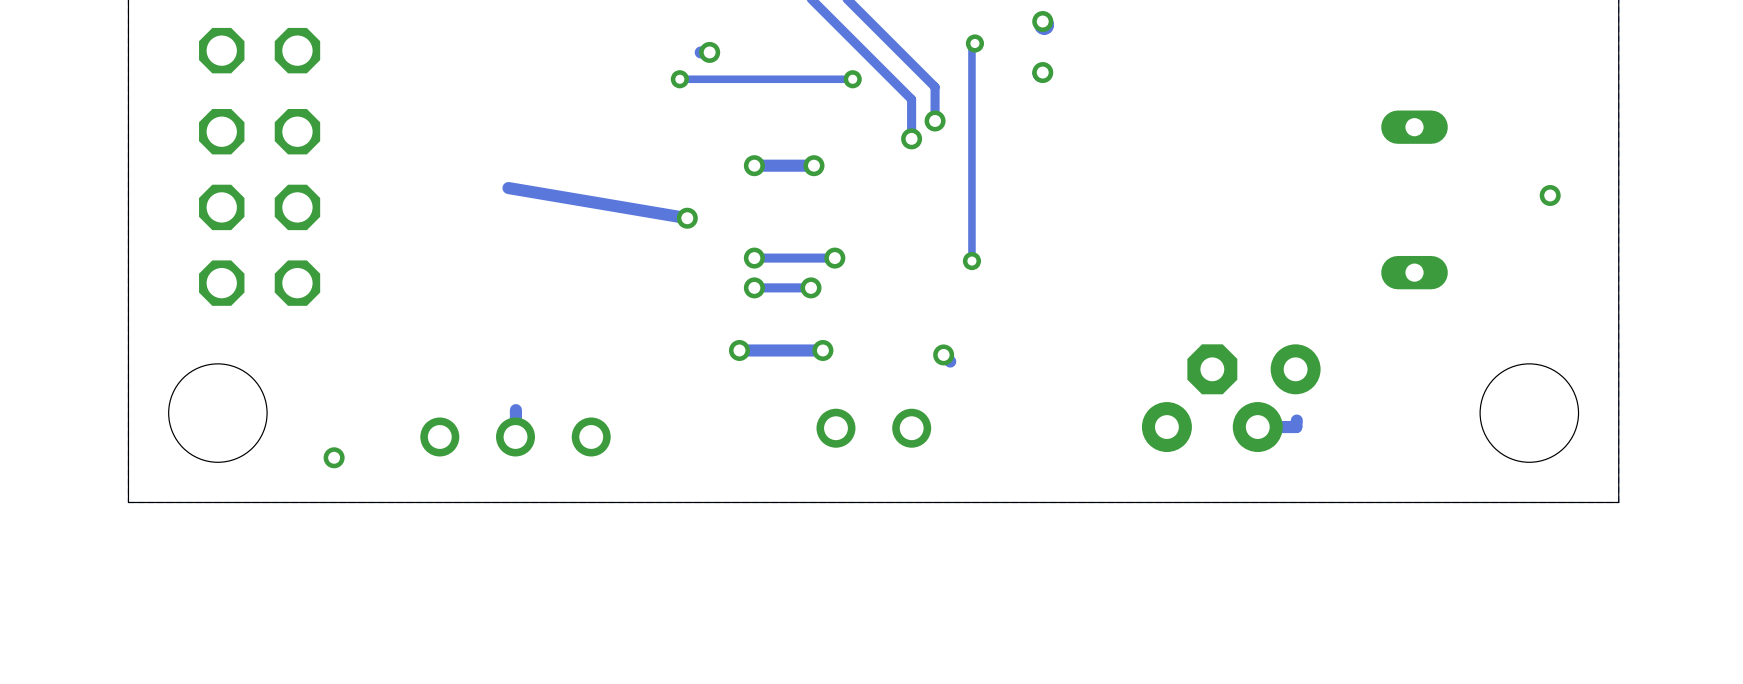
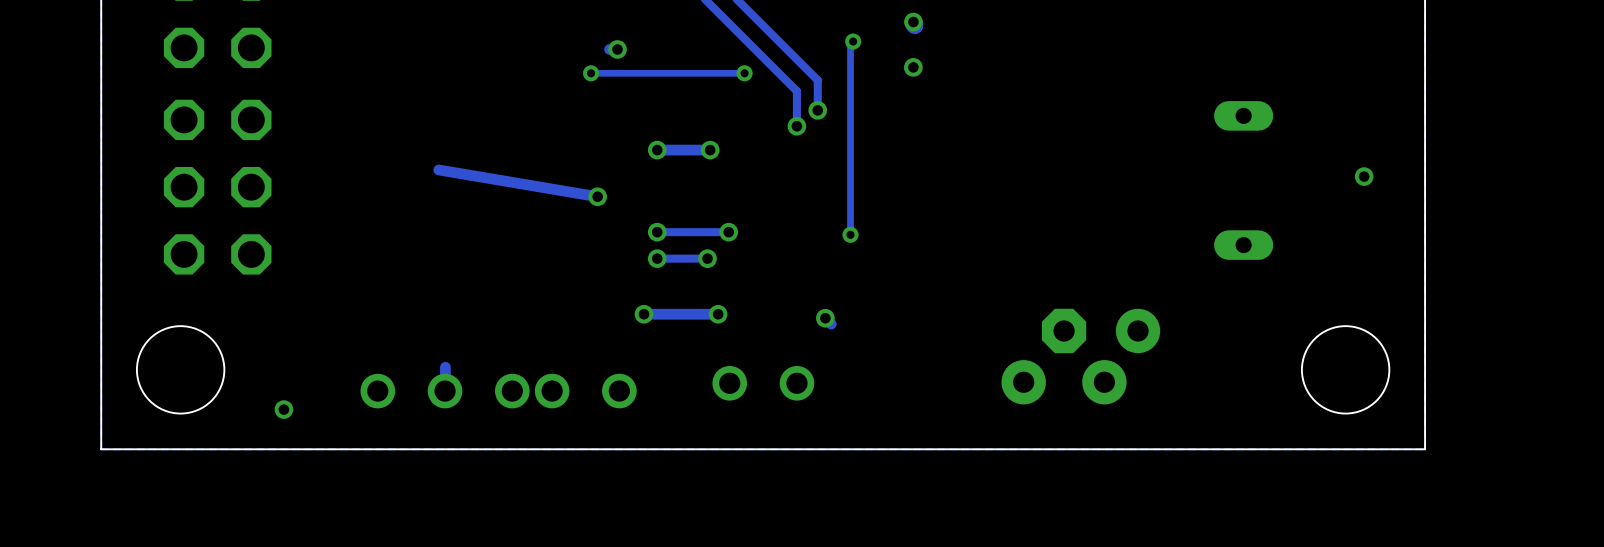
track: (1296, 420) (1296, 427) (1257, 427) -> none
part: none -> (585, 391)

